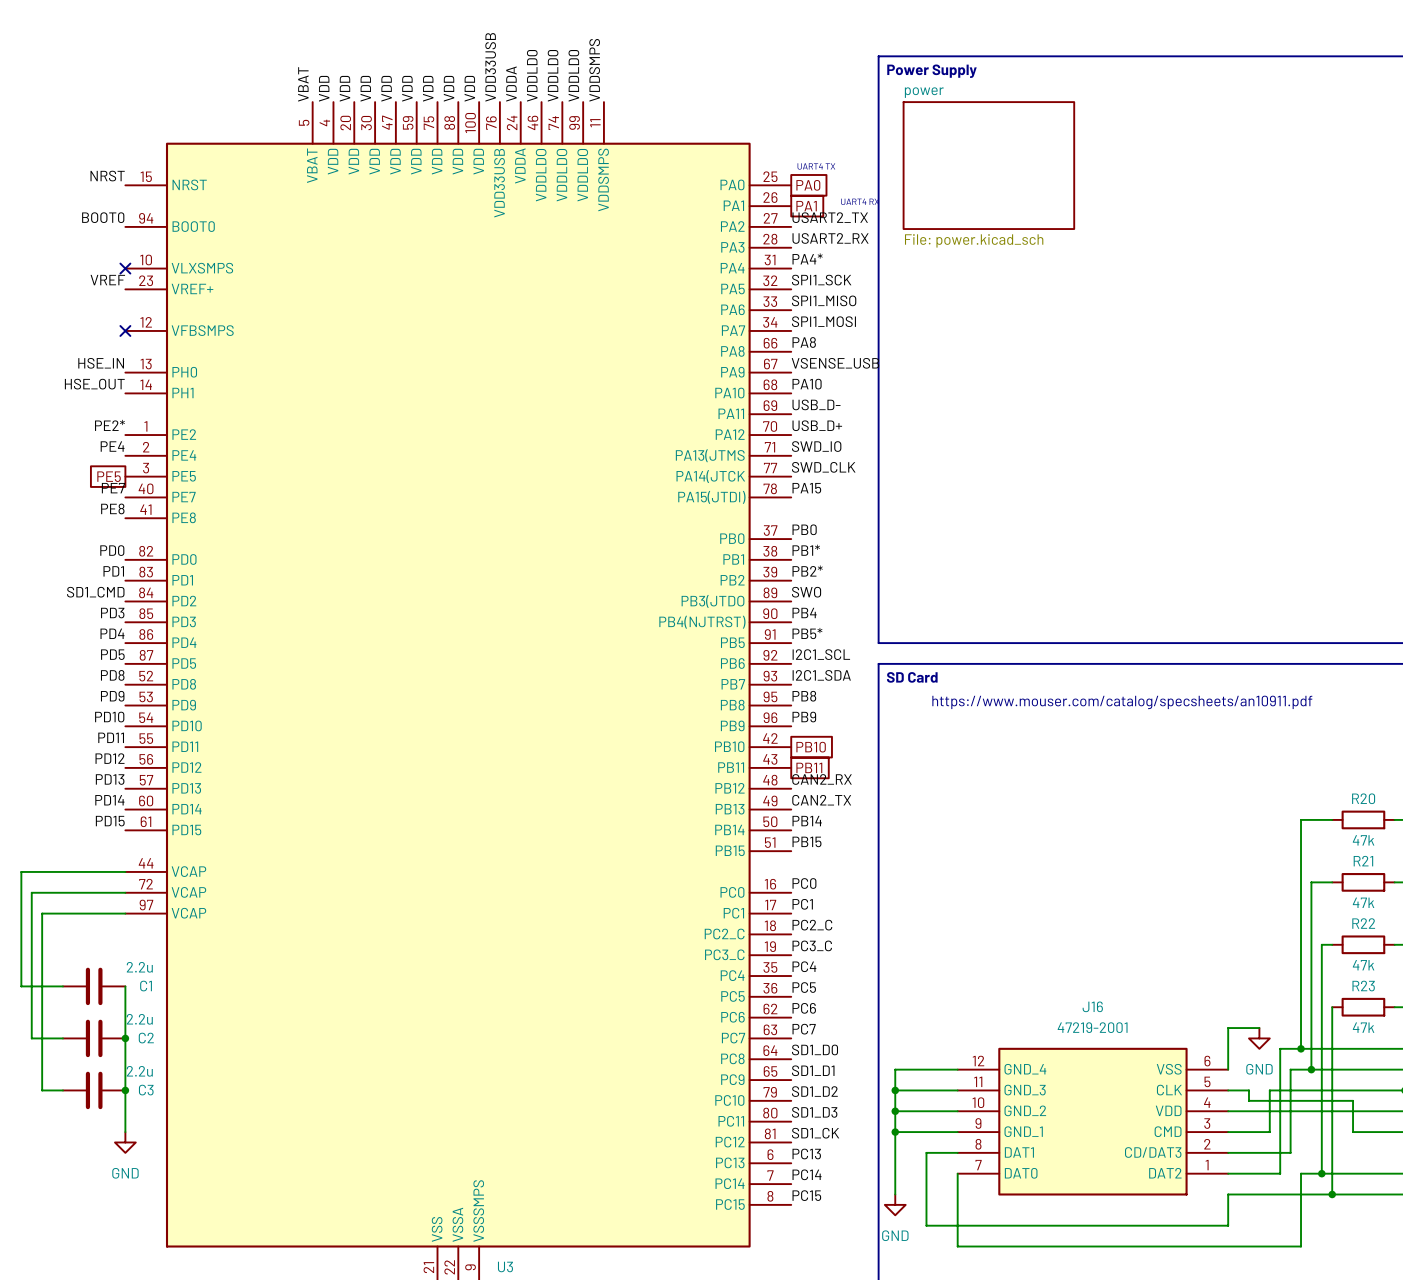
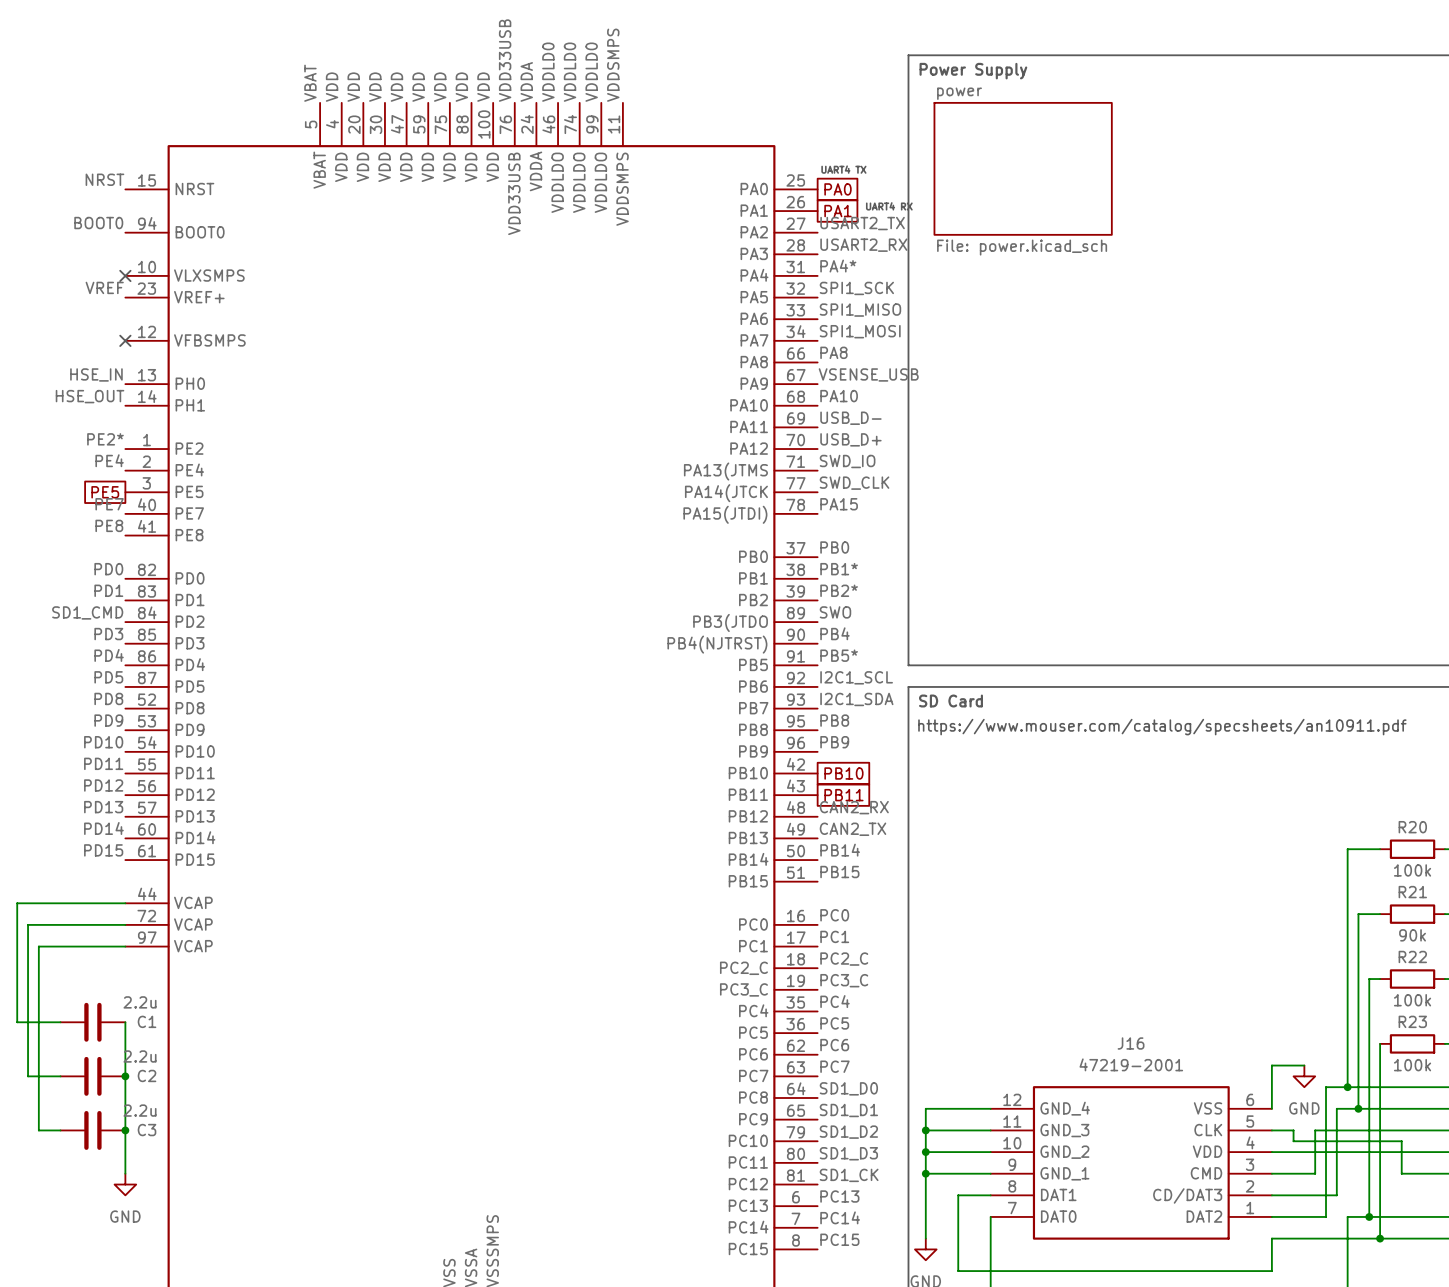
R20 value: 47k (1363, 840) -> 100k (1412, 870)
R21 value: 47k (1363, 902) -> 90k (1412, 935)
R22 value: 47k (1363, 965) -> 100k (1412, 1000)
R23 value: 47k (1363, 1027) -> 100k (1412, 1065)

